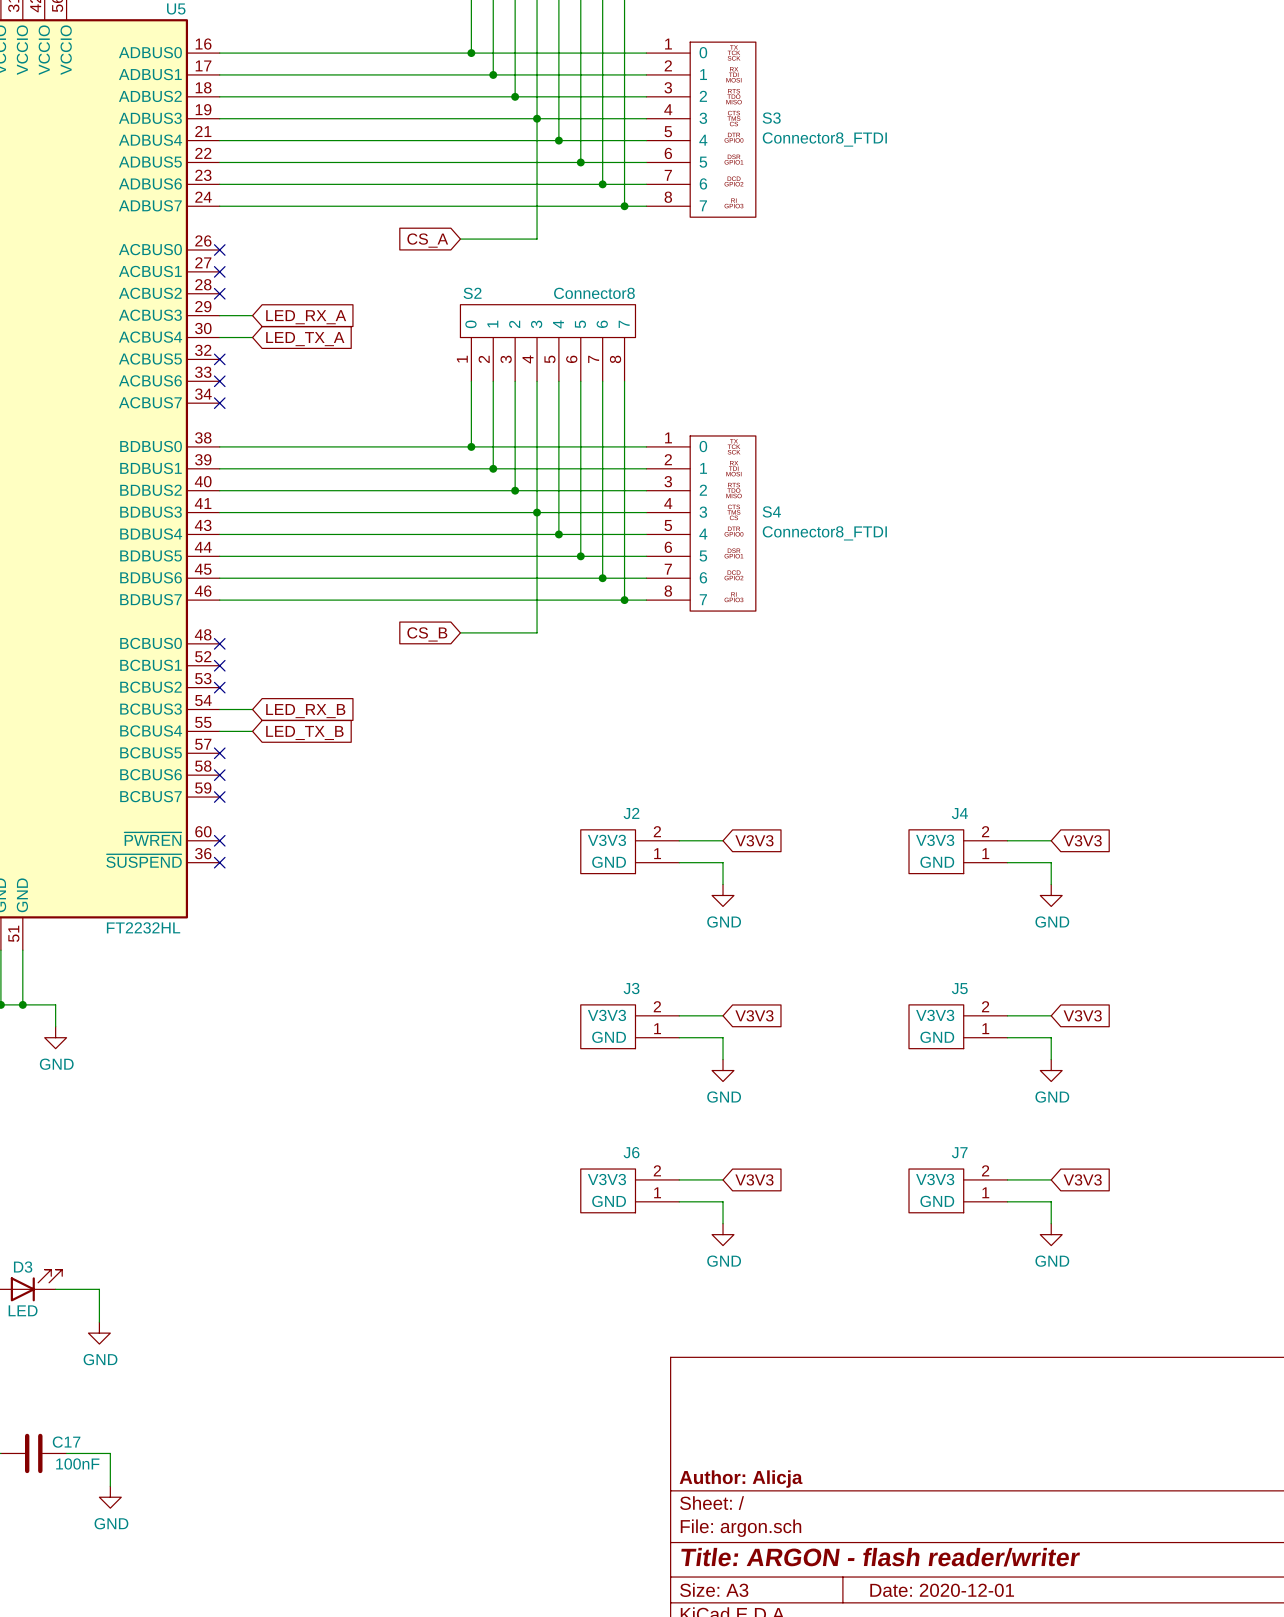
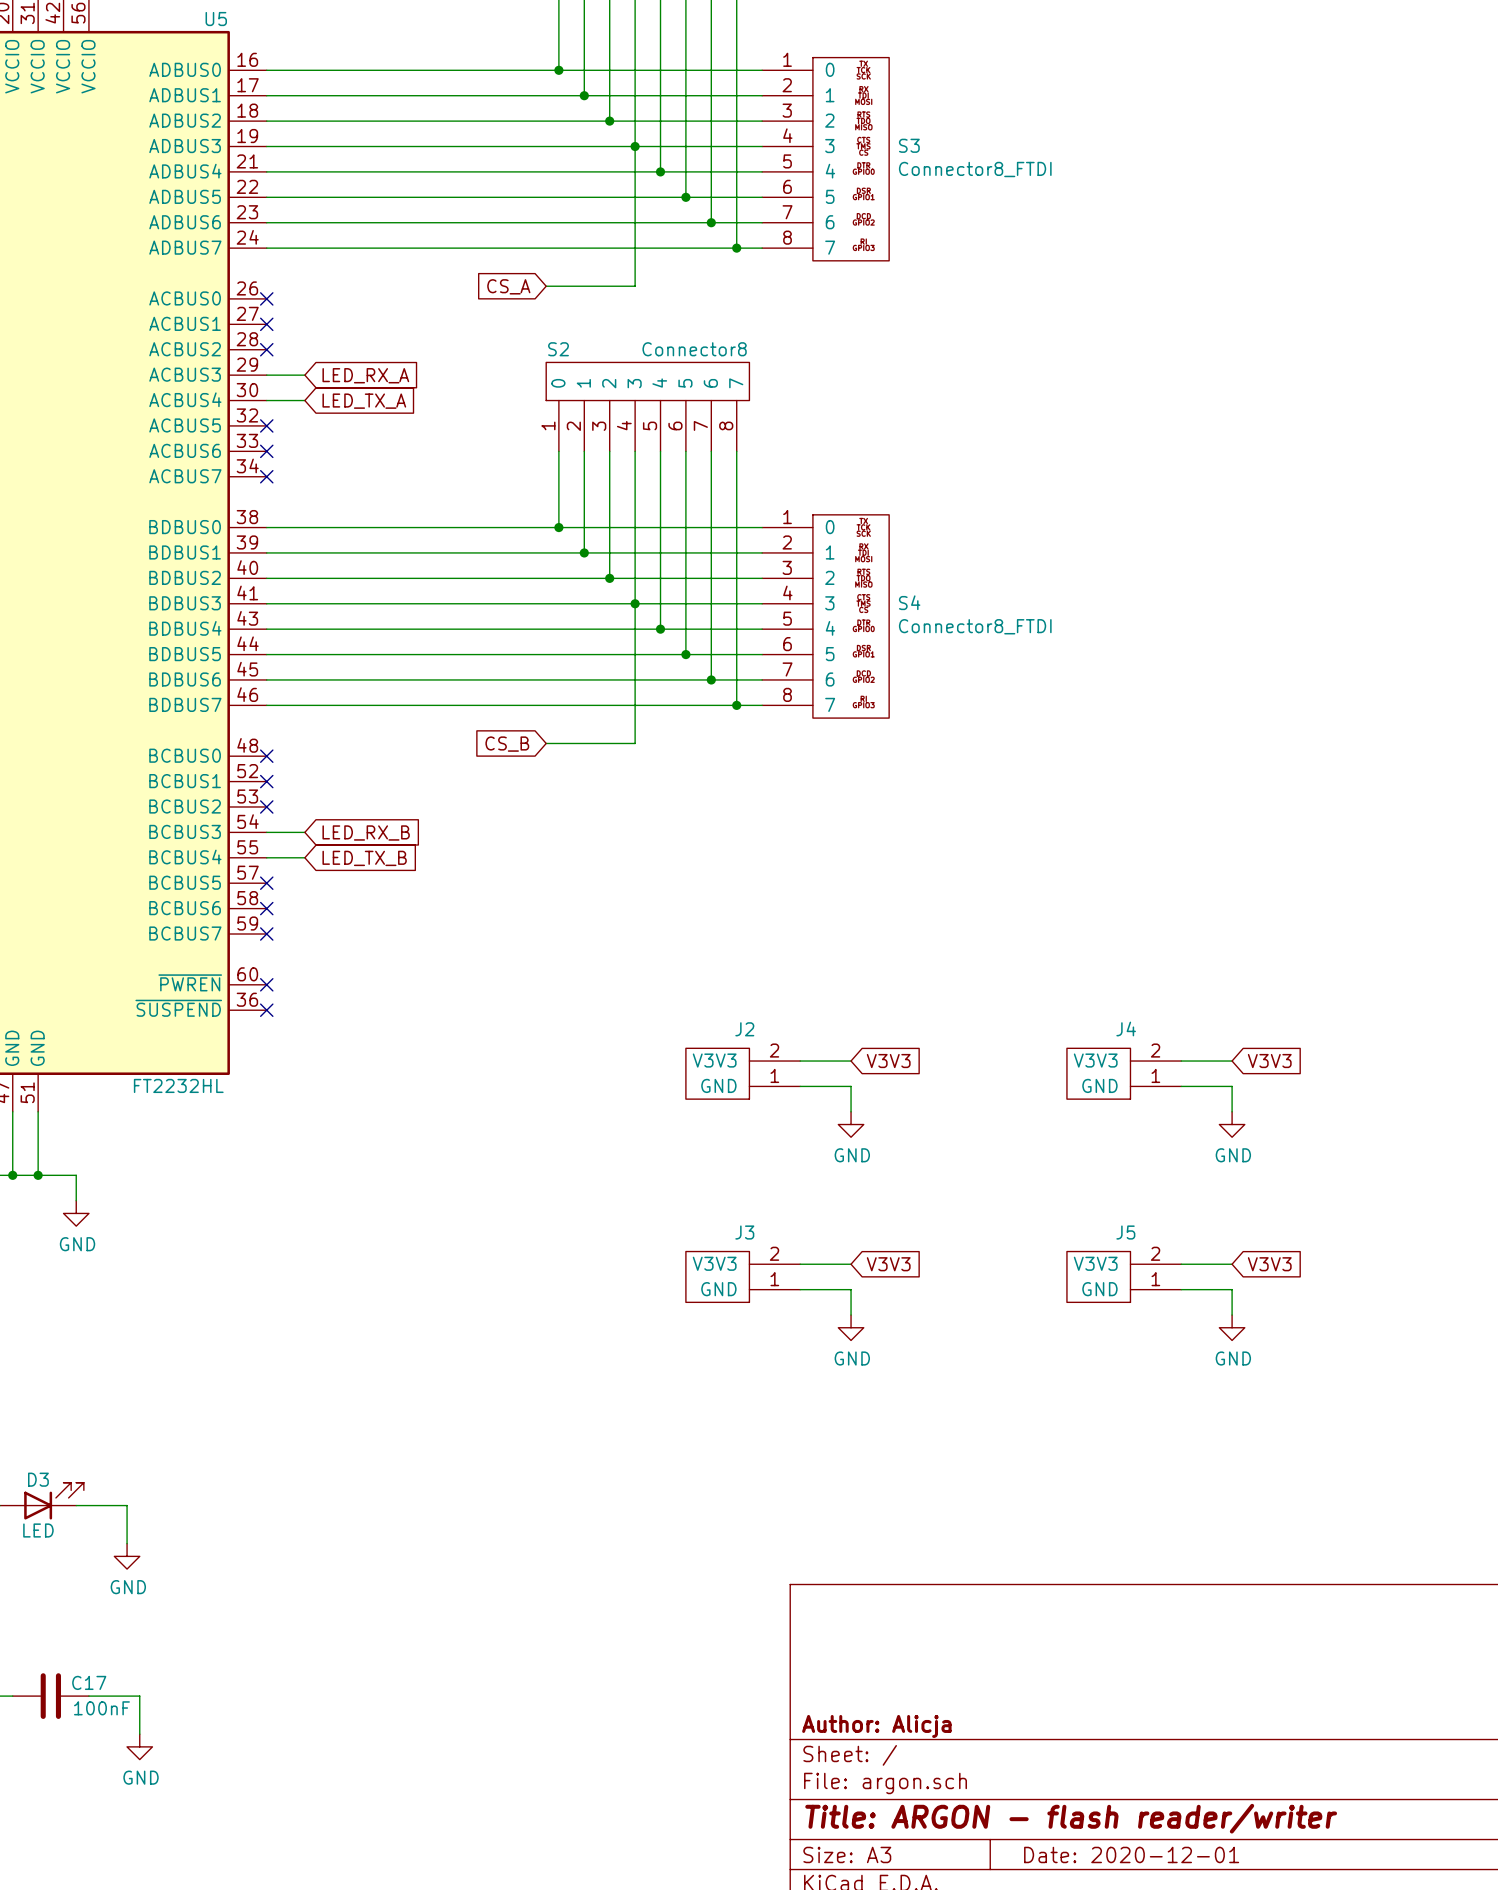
wire: (679, 840) (723, 840) -> (800, 1061) (851, 1061)
global label: V3V3 (754, 840) -> none
wire: (1007, 840) (1051, 840) -> (1181, 1061) (1232, 1061)
global label: V3V3 (1082, 840) -> none
J2 position: (630, 851) -> (743, 1073)
J4 position: (958, 851) -> (1124, 1073)
wire: (679, 862) (723, 862) (723, 884) -> (800, 1086) (851, 1086) (851, 1111)
wire: (1007, 862) (1051, 862) (1051, 884) -> (1181, 1086) (1232, 1086) (1232, 1111)
power symbol: GND (723, 895) -> none
power symbol: GND (1051, 895) -> none
global label: none -> V3V3 (888, 1061)
global label: none -> V3V3 (1269, 1061)
power symbol: none -> GND (851, 1124)
power symbol: none -> GND (1232, 1124)
wire: (679, 1015) (723, 1015) -> (800, 1264) (851, 1264)
global label: V3V3 (754, 1015) -> none
wire: (1007, 1015) (1051, 1015) -> (1181, 1264) (1232, 1264)
global label: V3V3 (1082, 1015) -> none
J3 position: (630, 1026) -> (743, 1276)
J5 position: (958, 1026) -> (1124, 1276)
wire: (679, 1037) (723, 1037) (723, 1059) -> (800, 1289) (851, 1289) (851, 1315)
wire: (1007, 1037) (1051, 1037) (1051, 1059) -> (1181, 1289) (1232, 1289) (1232, 1315)
power symbol: GND (723, 1070) -> none
power symbol: GND (1051, 1070) -> none
global label: none -> V3V3 (888, 1264)
global label: none -> V3V3 (1269, 1264)
power symbol: none -> GND (851, 1327)
power symbol: none -> GND (1232, 1327)
wire: (679, 1179) (723, 1179) -> none
global label: V3V3 (754, 1179) -> none
wire: (1007, 1179) (1051, 1179) -> none
global label: V3V3 (1082, 1179) -> none
J6: (630, 1190) -> none
J7: (958, 1190) -> none
wire: (679, 1201) (723, 1201) (723, 1223) -> none
wire: (1007, 1201) (1051, 1201) (1051, 1223) -> none
power symbol: GND (723, 1234) -> none
power symbol: GND (1051, 1234) -> none

